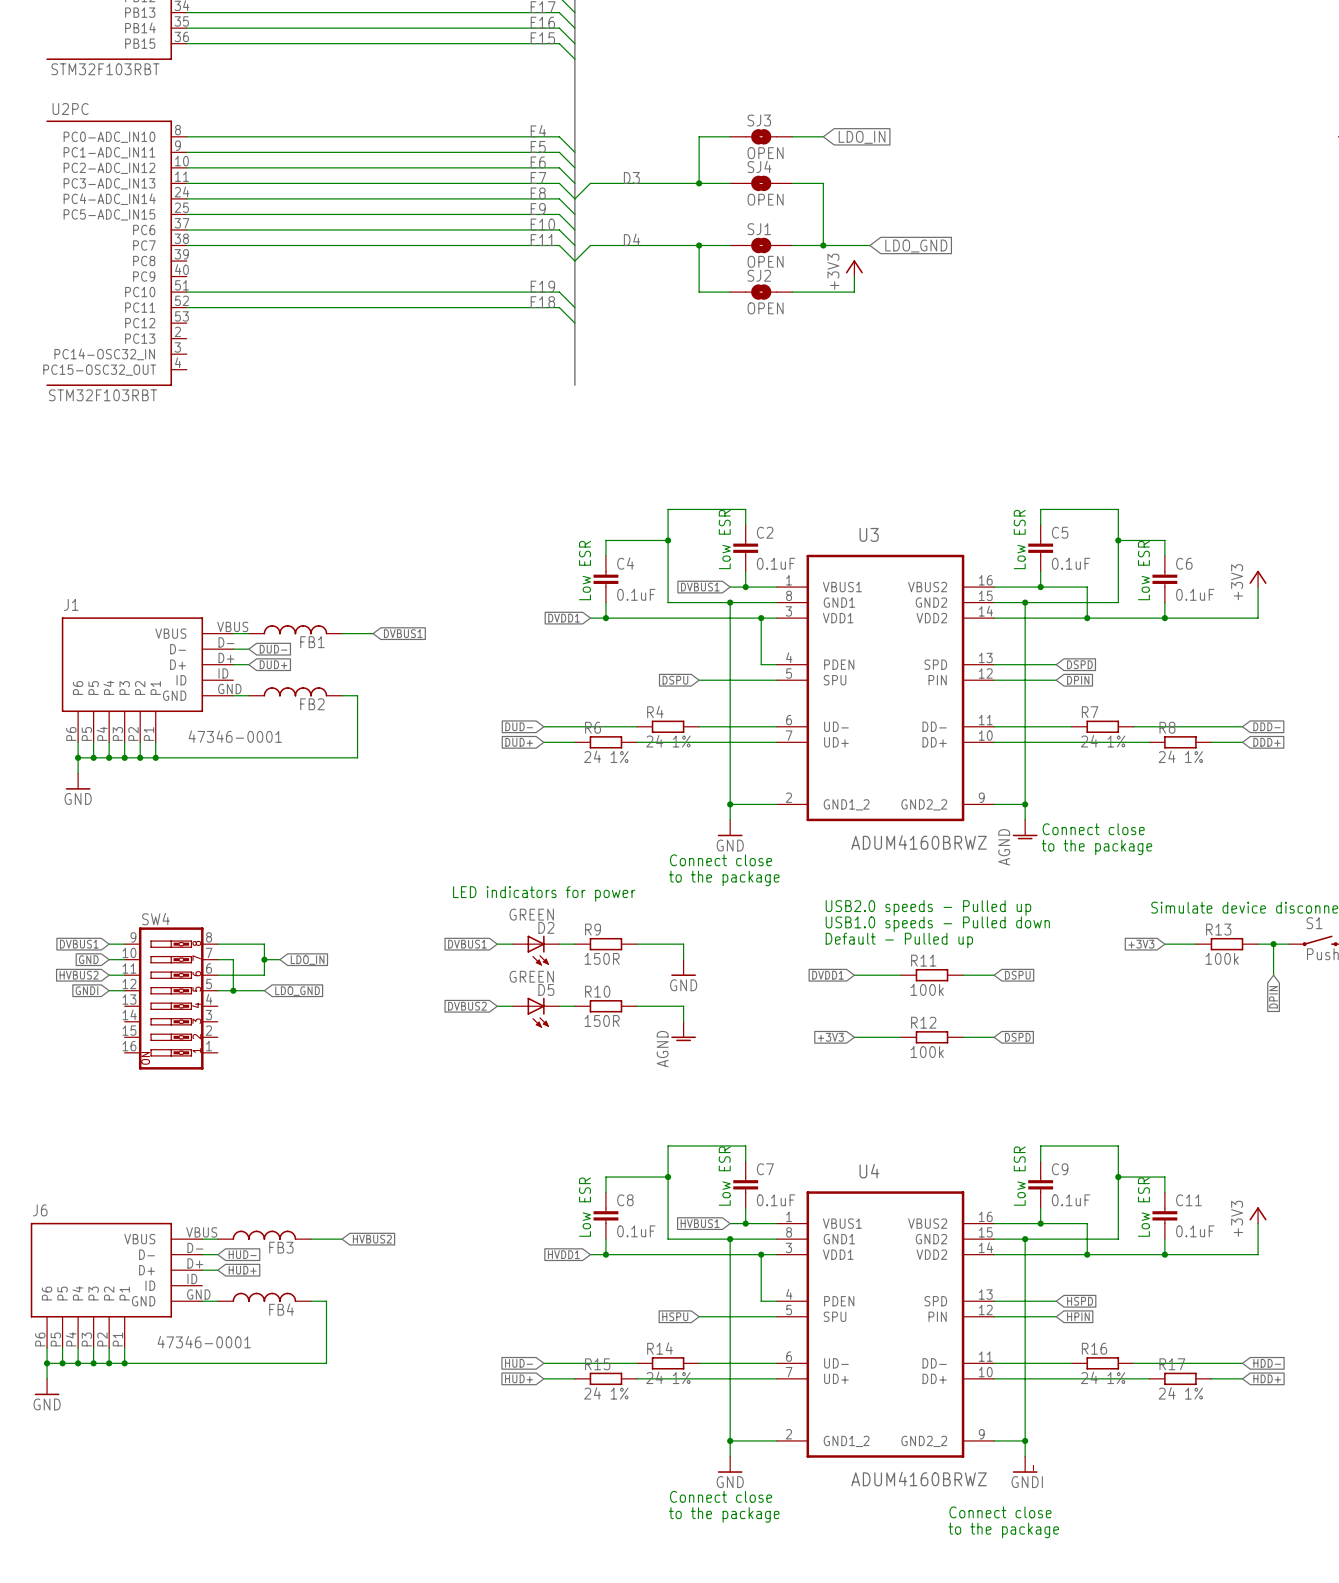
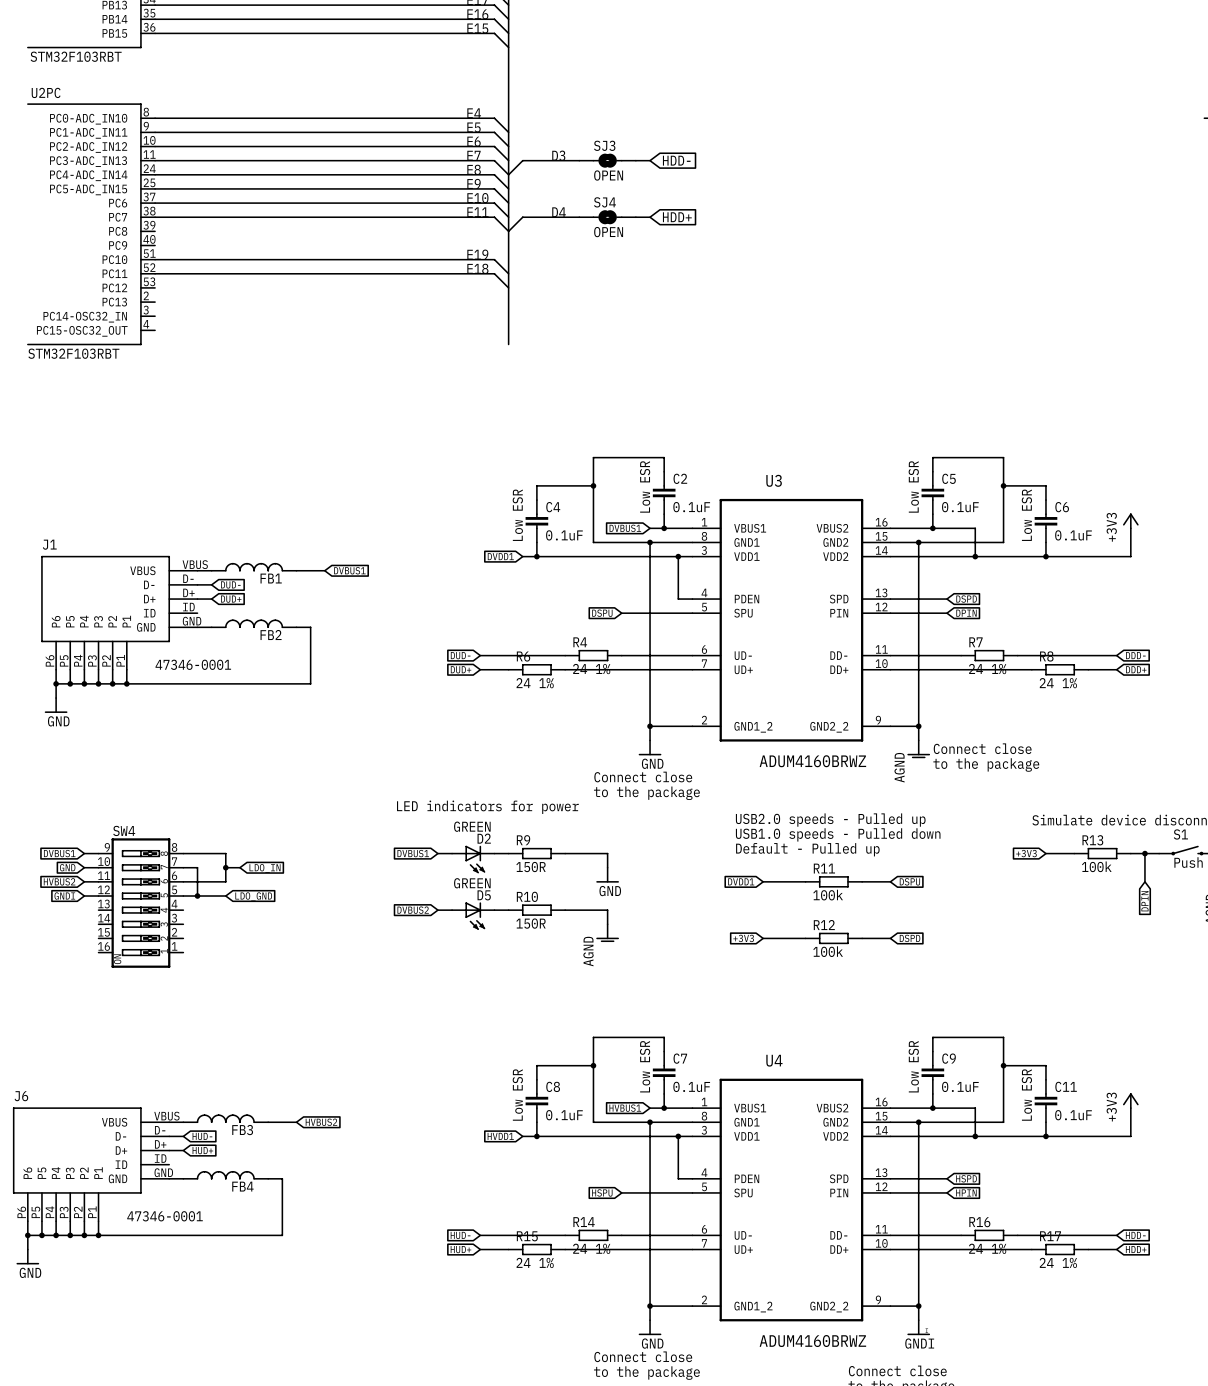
wire: (730, 136) (699, 136) (699, 183) -> none
SJ3 position: (761, 136) -> (607, 160)
wire: (792, 136) (823, 136) -> none
global label: LDO_IN (862, 137) -> none
junction: (699, 183) -> none
SJ4 position: (761, 183) -> (607, 217)
global label: none -> HDD- (676, 160)
wire: (792, 183) (823, 183) (823, 245) -> none
wire: (699, 245) (699, 292) (730, 292) -> none
junction: (699, 245) -> none
SJ1: OPEN (761, 245) -> none
global label: none -> HDD+ (677, 217)
wire: (792, 245) (869, 245) -> none
junction: (823, 245) -> none
global label: LDO_GND (916, 246) -> none
power symbol: +3V3 (854, 268) -> none
wire: (854, 276) (854, 292) (792, 292) -> none
SJ2: OPEN (761, 292) -> none

